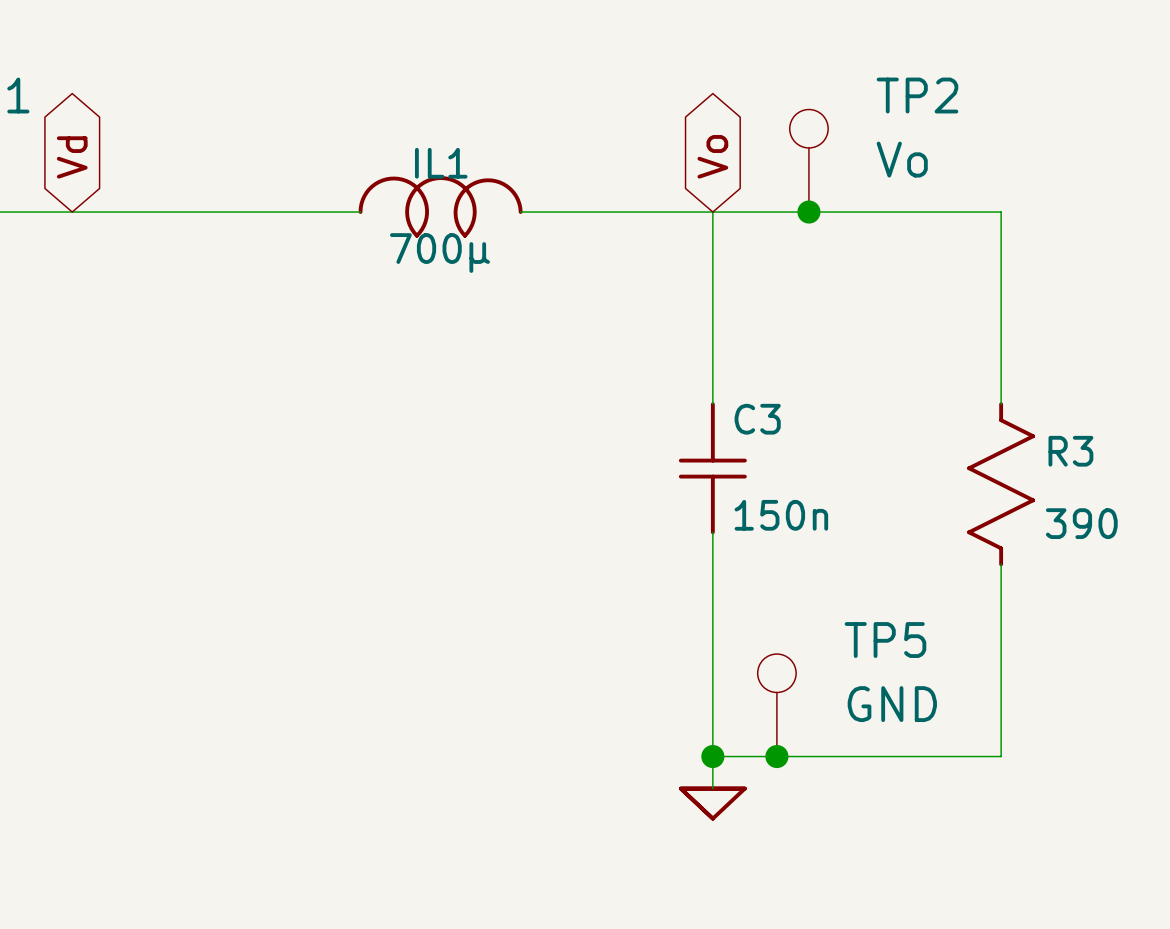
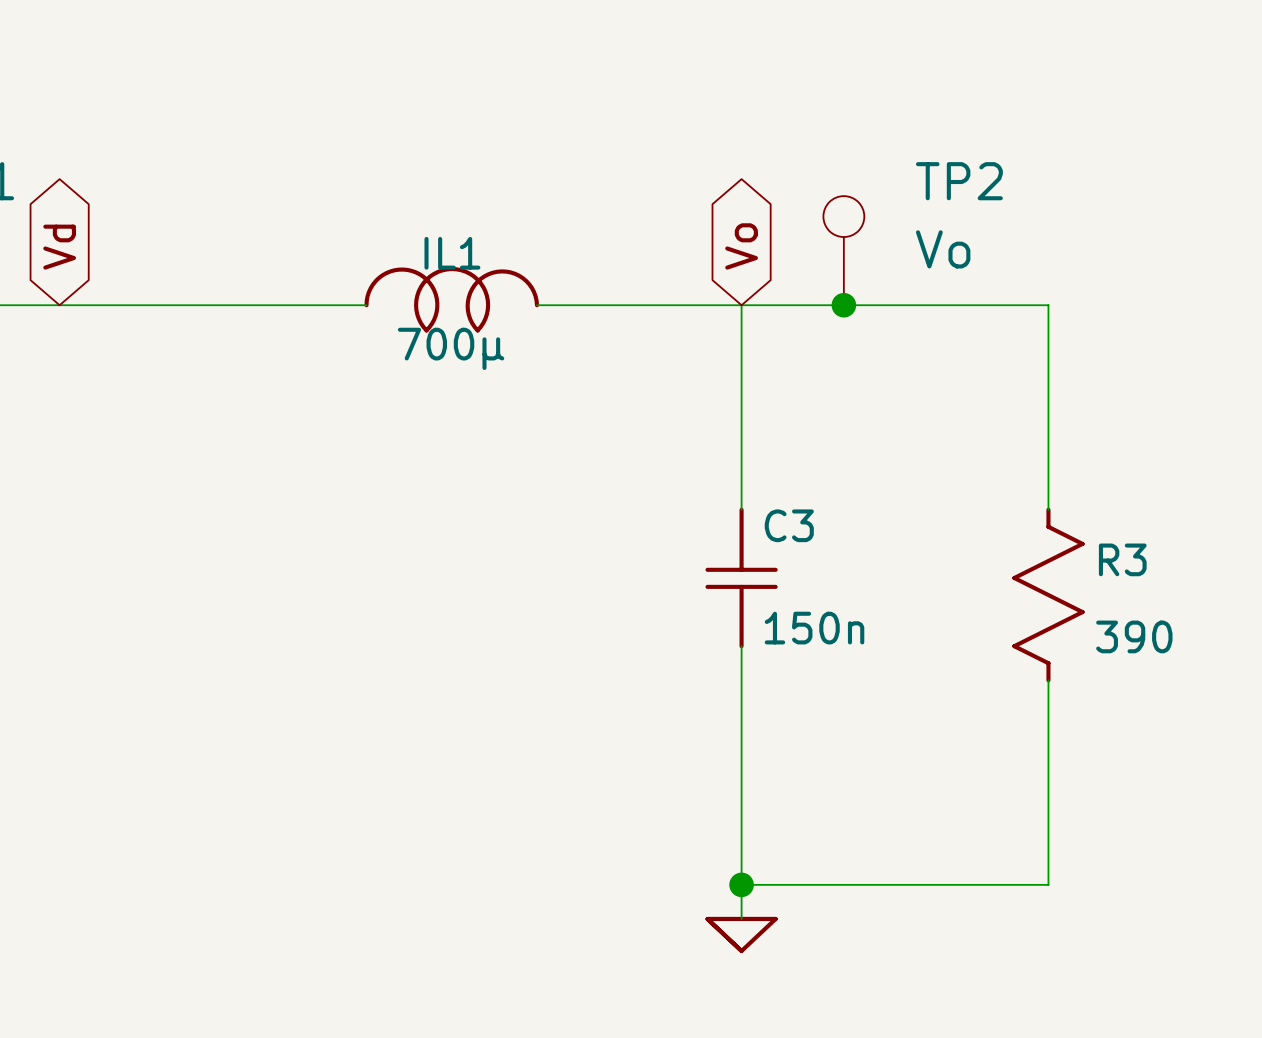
TP5: GND (776, 705) -> none
junction: (776, 756) -> none

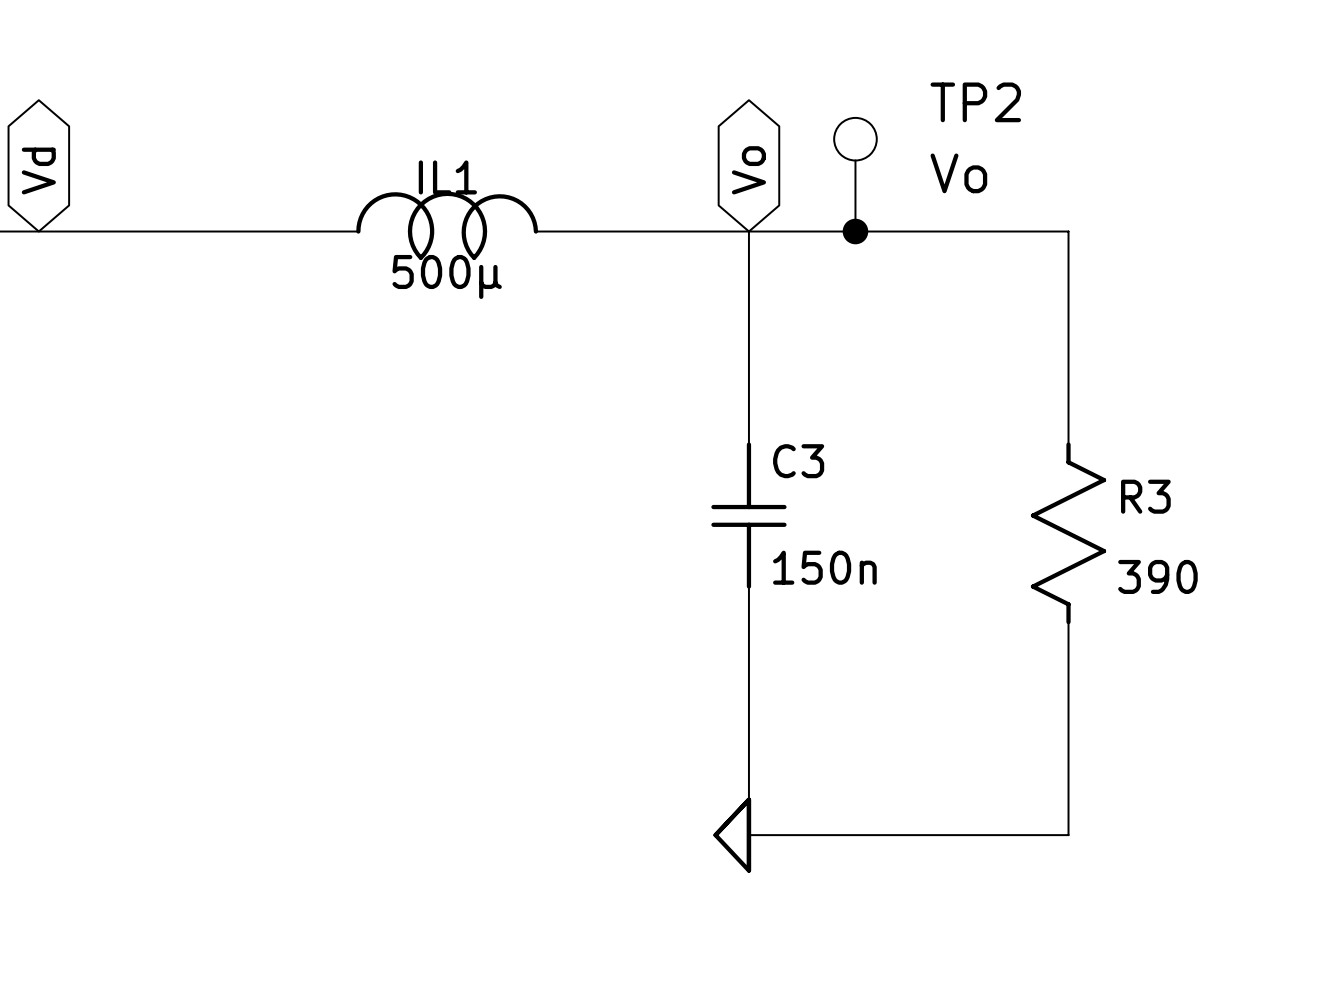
IL1 value: 700µ (451, 348) -> 500µ (447, 276)
junction: (741, 884) -> none
power symbol rotation: 0° (741, 935) -> 90° clockwise (732, 835)
power symbol position: (741, 935) -> (732, 835)

